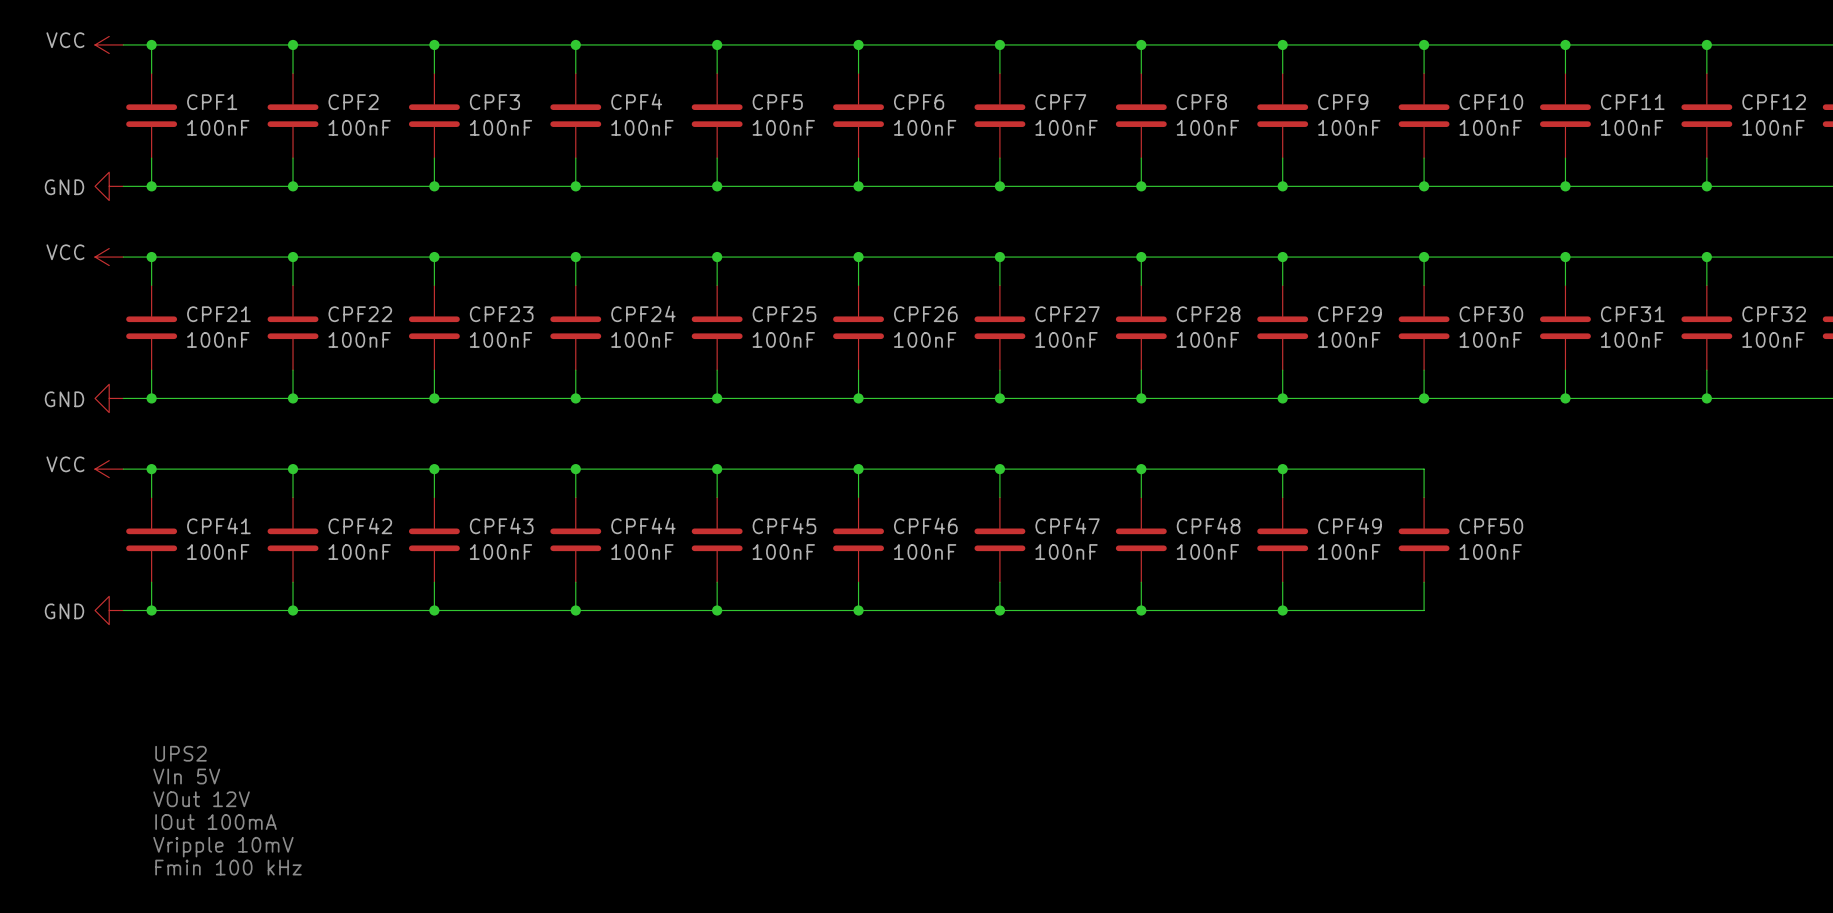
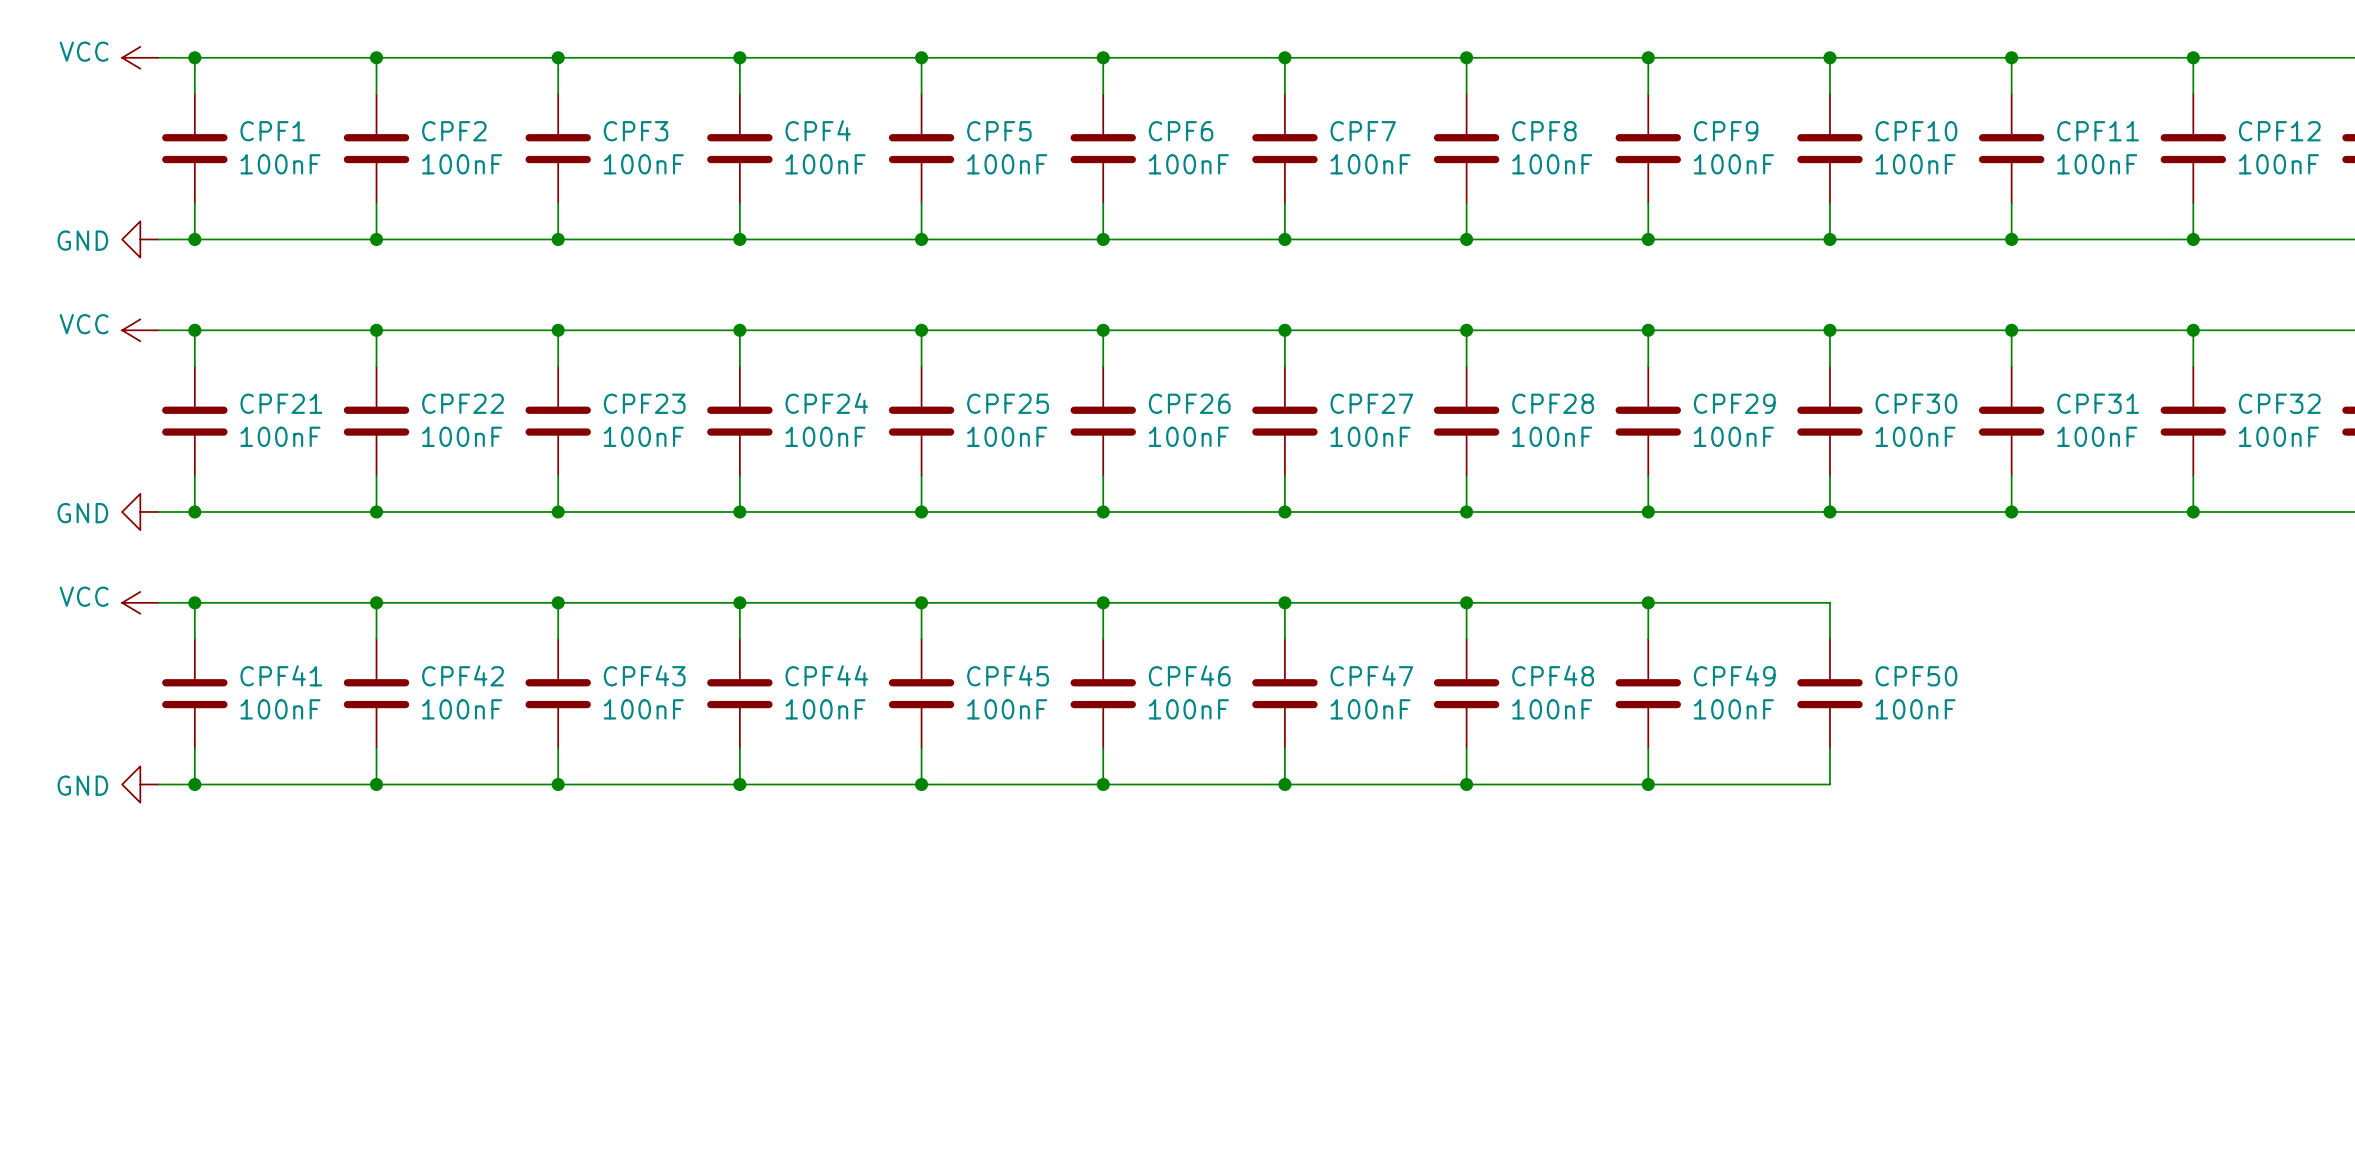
text: UPS2 (181, 753) -> none
text: VIn 5V (186, 776) -> none
text: VOut 12V (201, 799) -> none
text: IOut 100mA (216, 822) -> none
text: Vripple 10mV (223, 847) -> none
text: Fmin 100 kHz (228, 867) -> none

